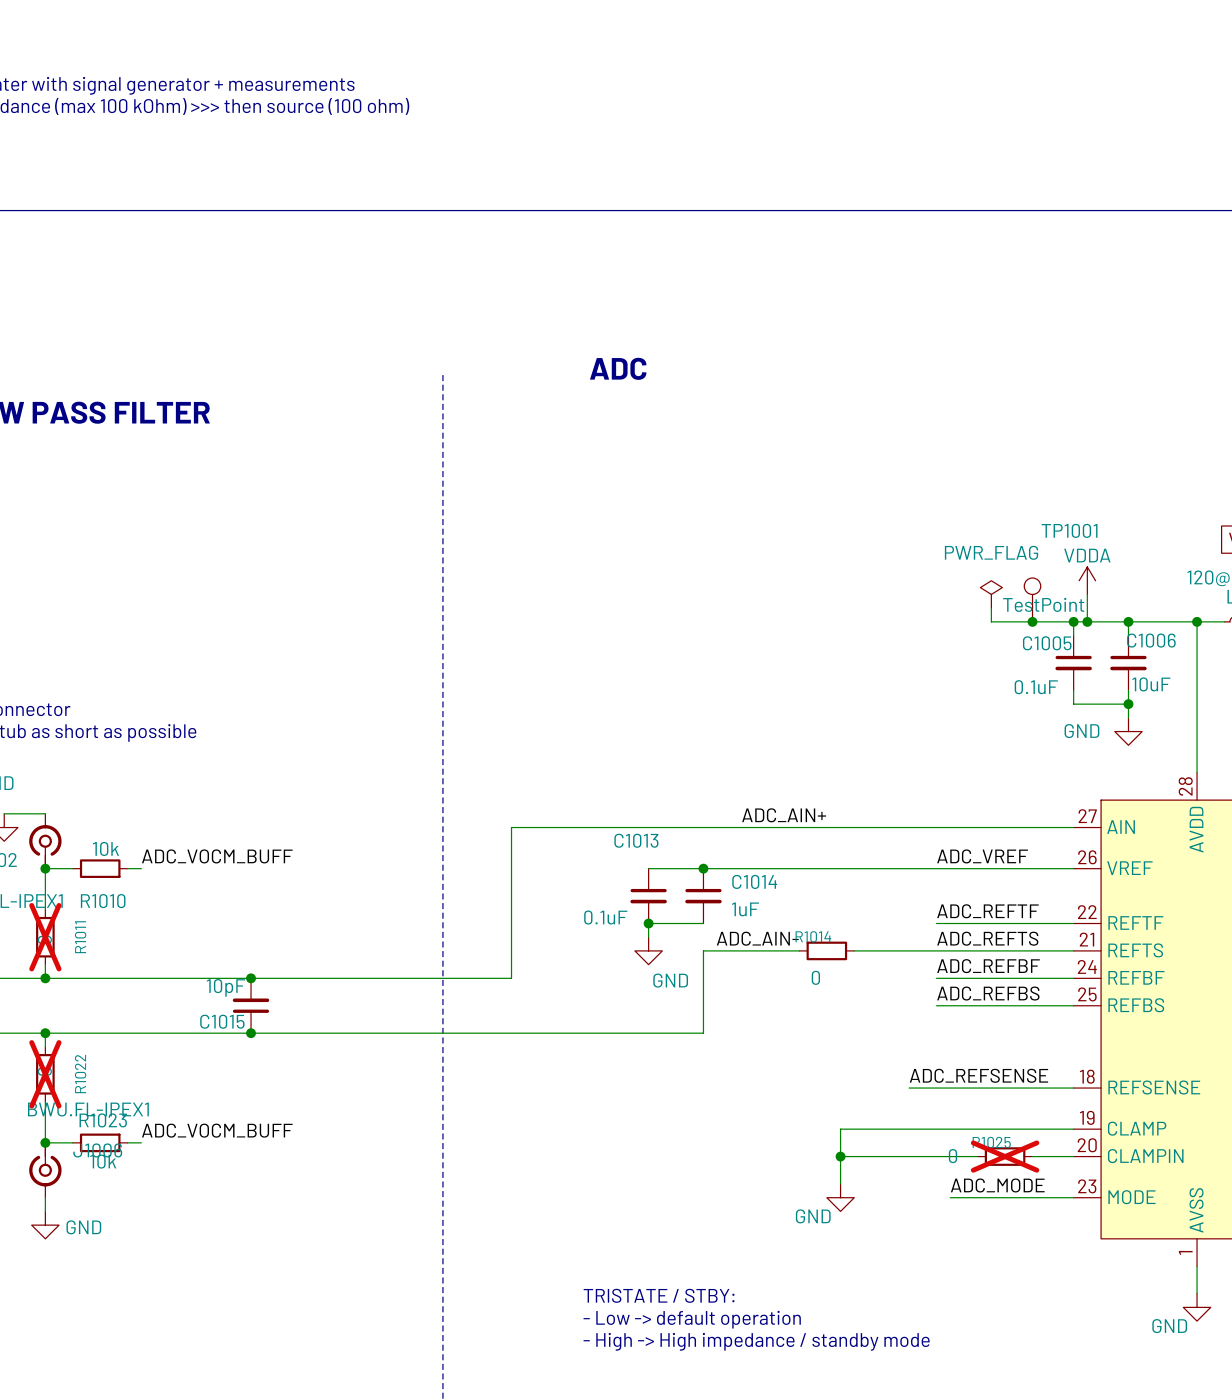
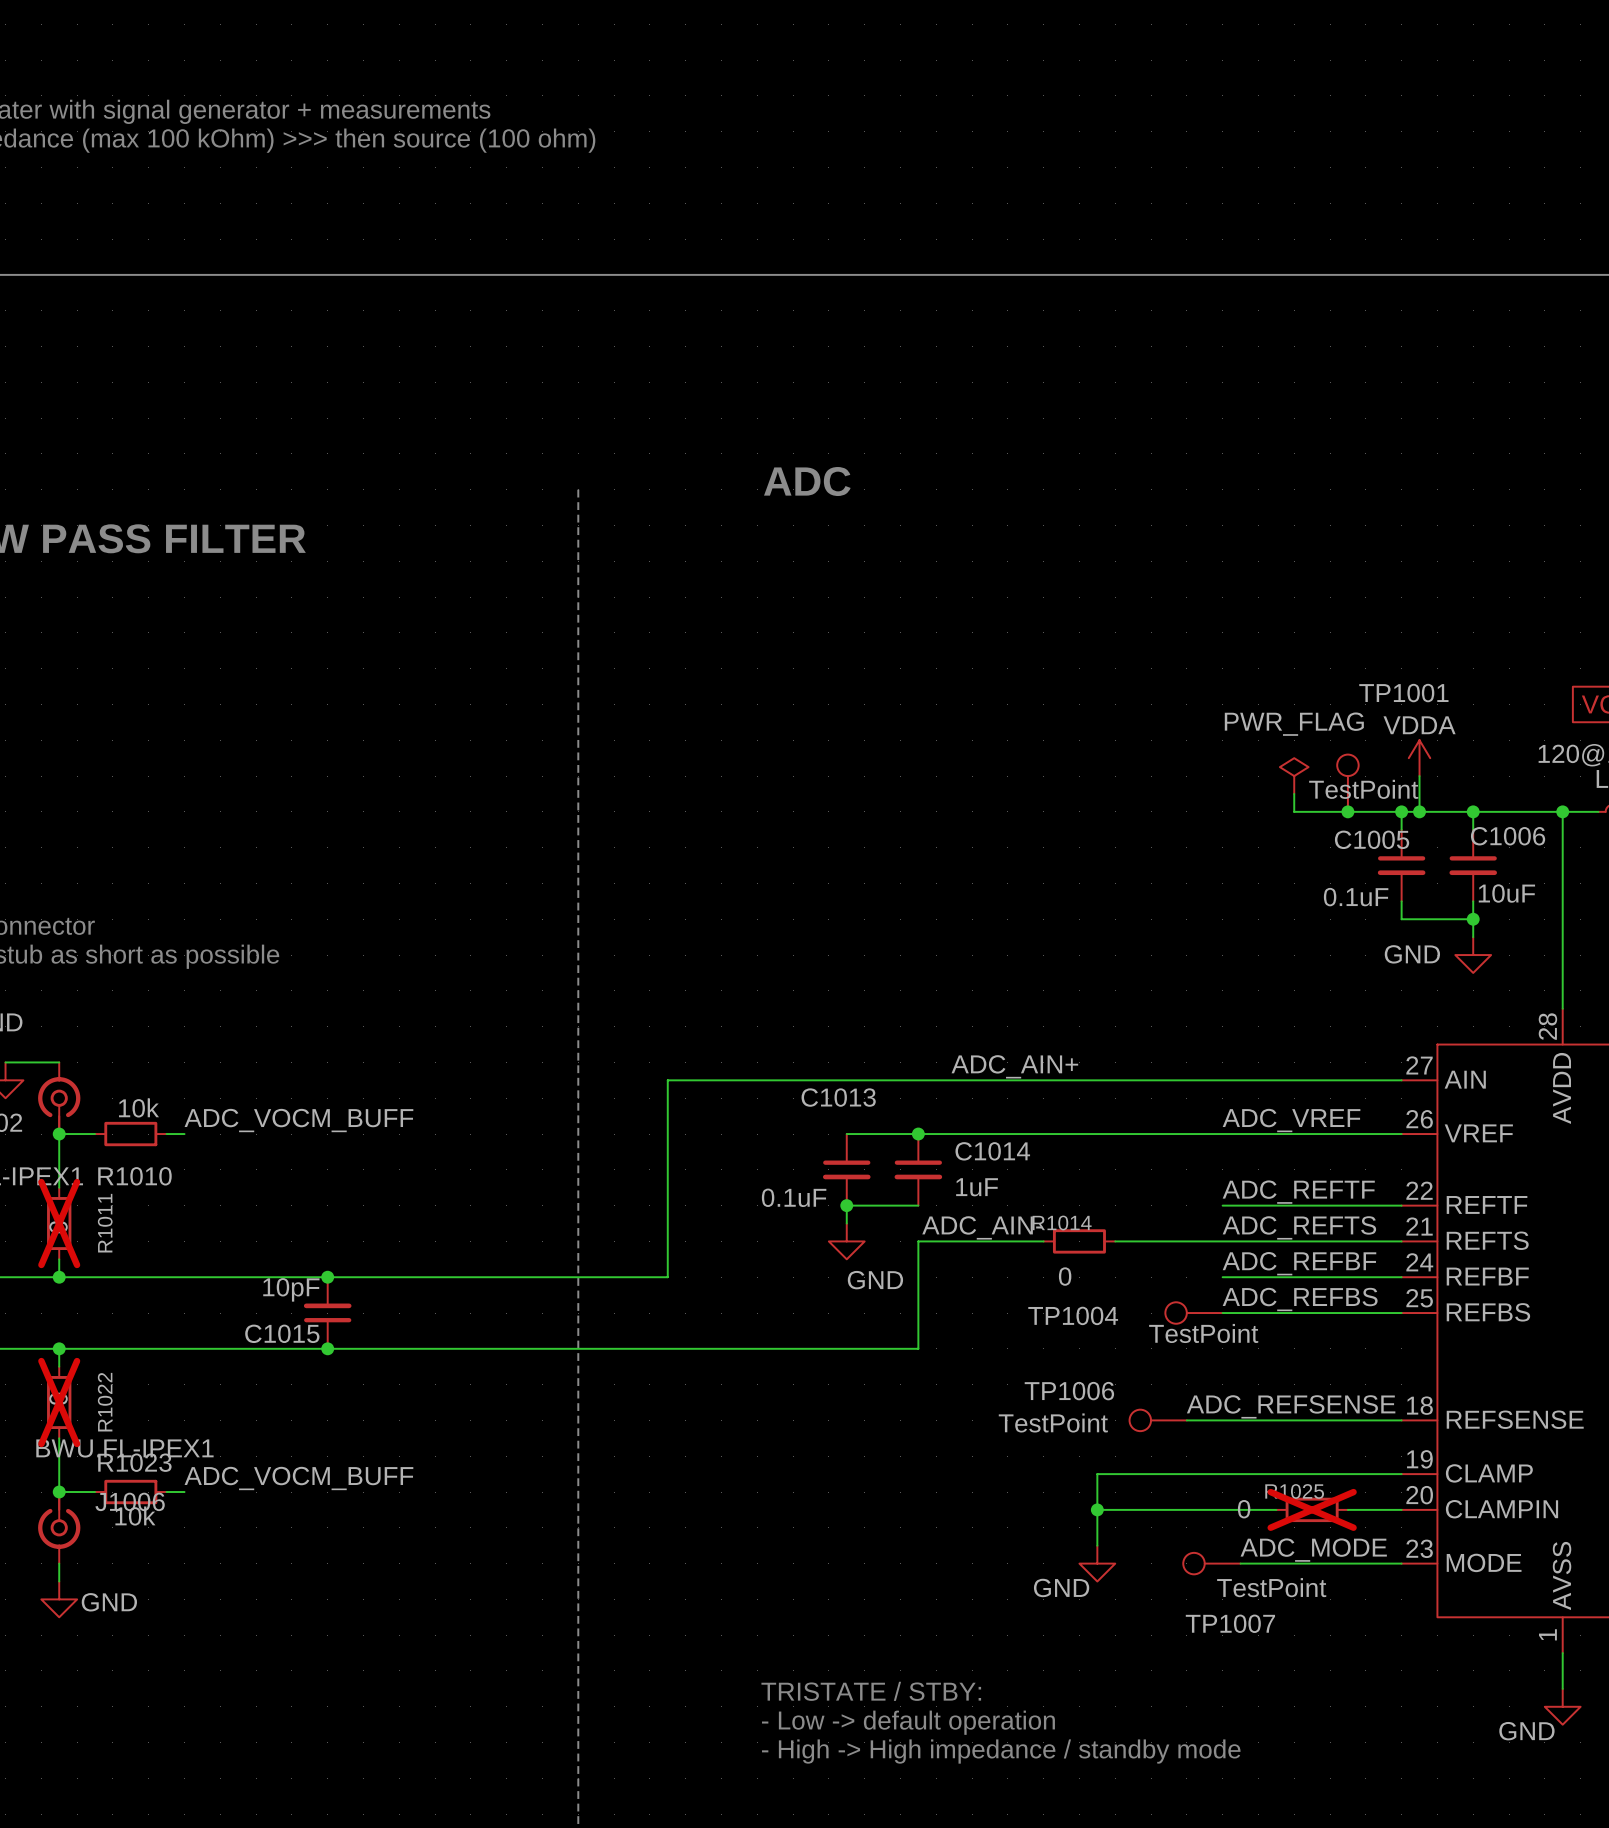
TP1004: none -> TestPoint (1194, 1313)
TP1006: none -> TestPoint (1158, 1420)
TP1007: none -> TestPoint (1211, 1563)

